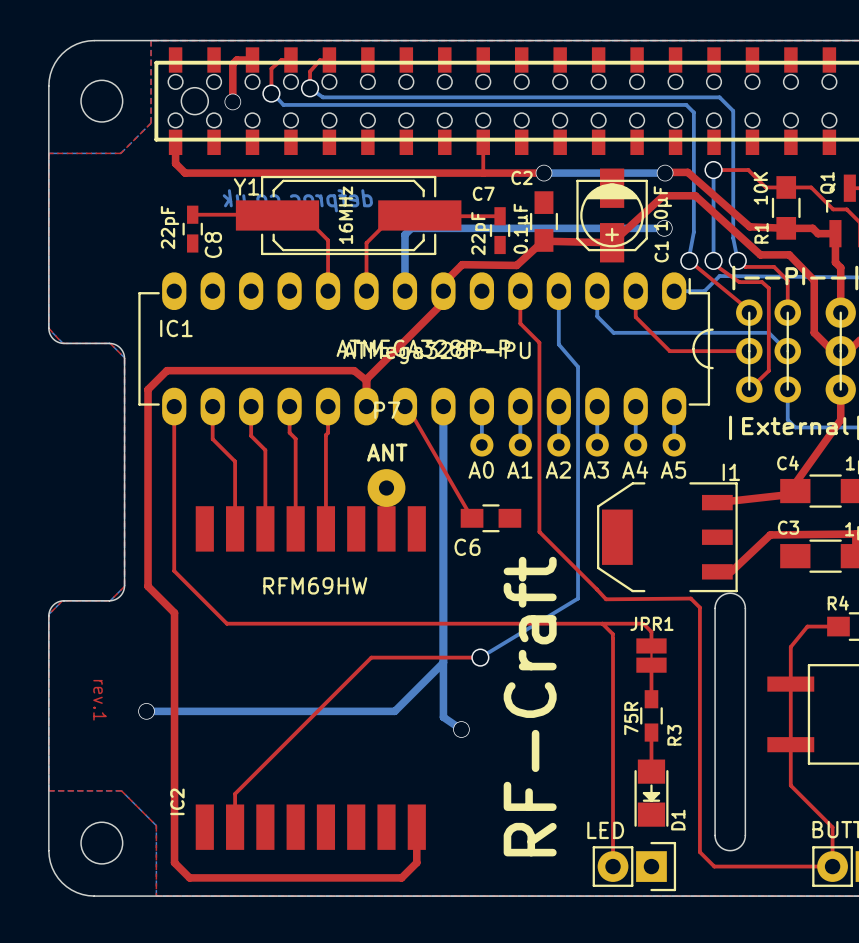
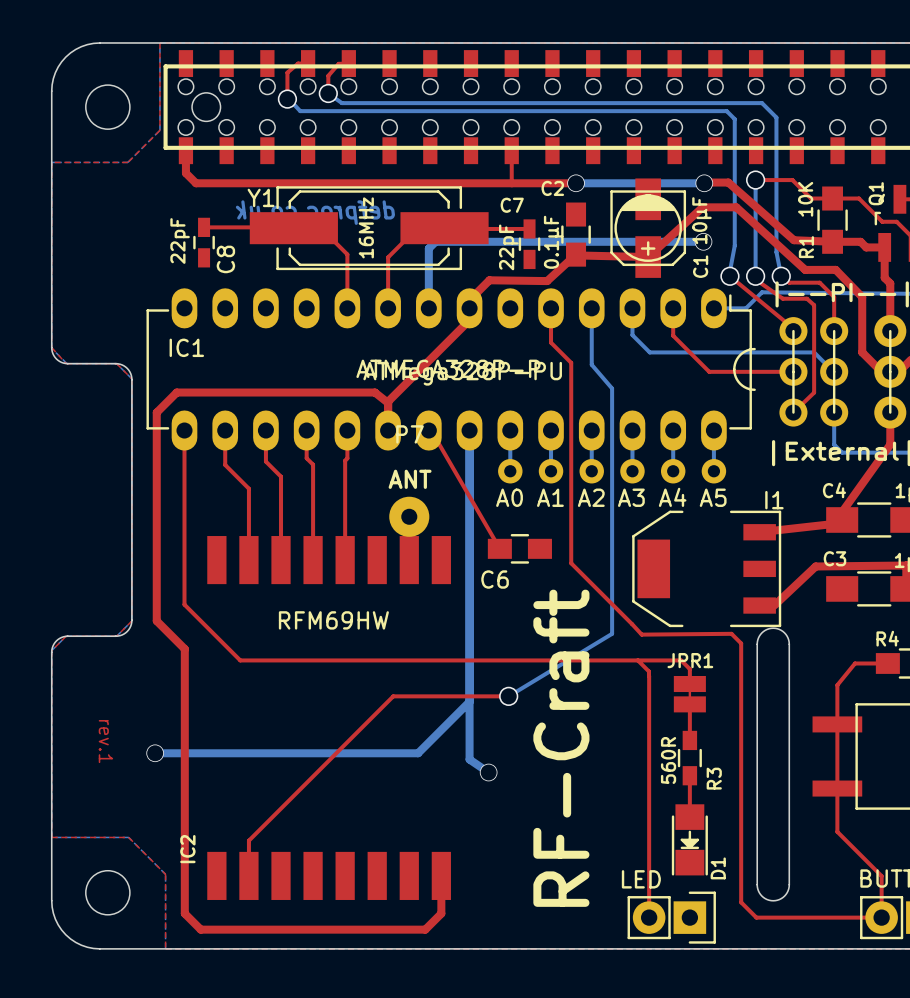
top track: (252, 60) (236, 60) (232, 64) (232, 101) -> none
via: (232, 101) -> none
text: 75R (631, 718) -> 560R (668, 760)

